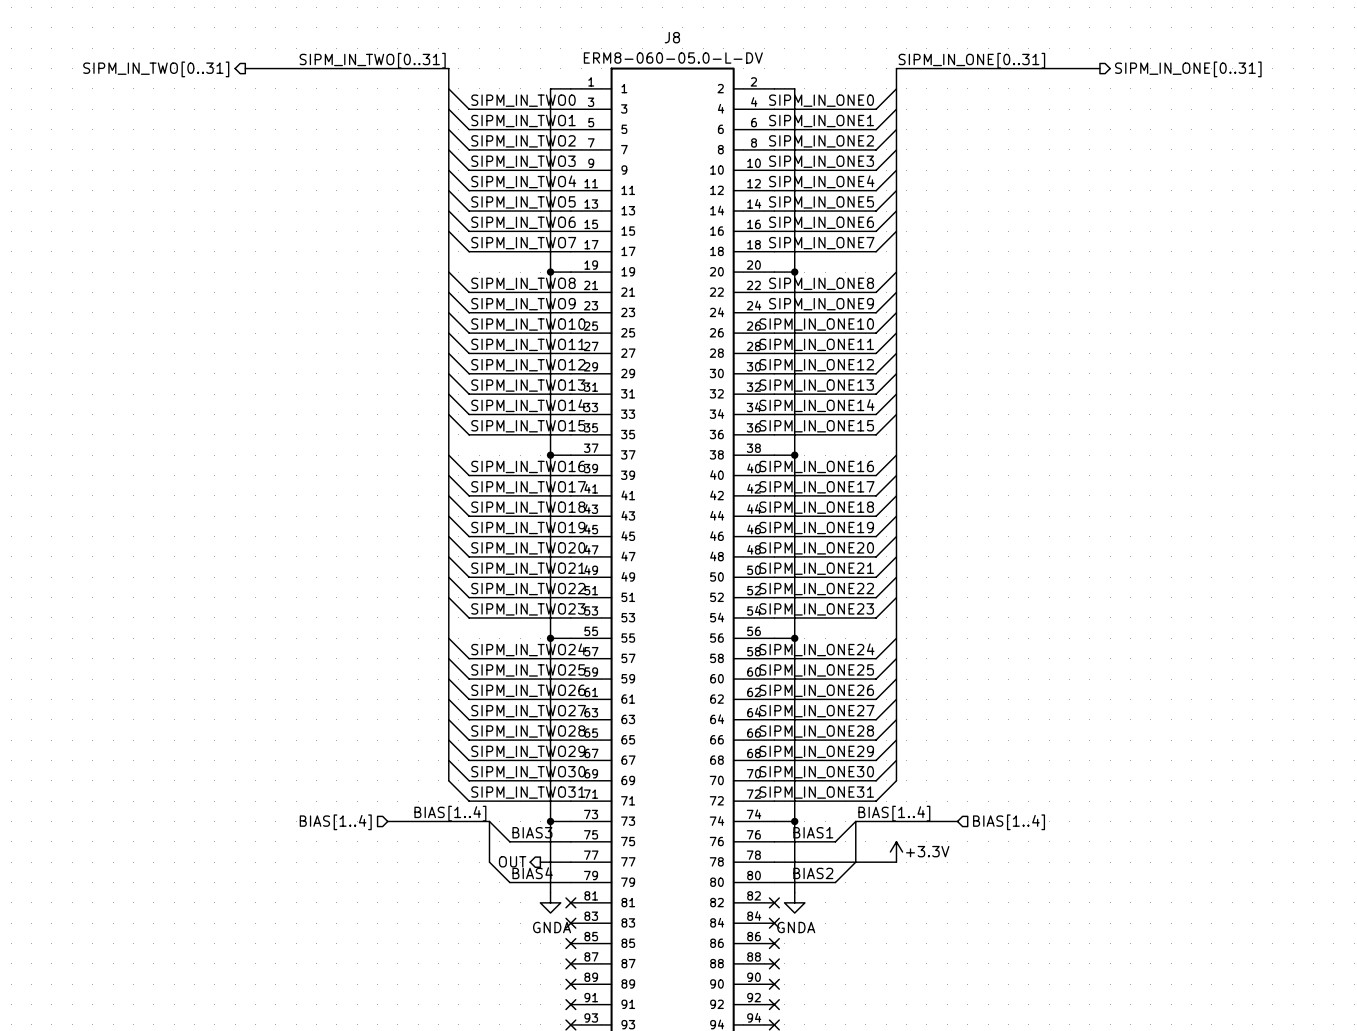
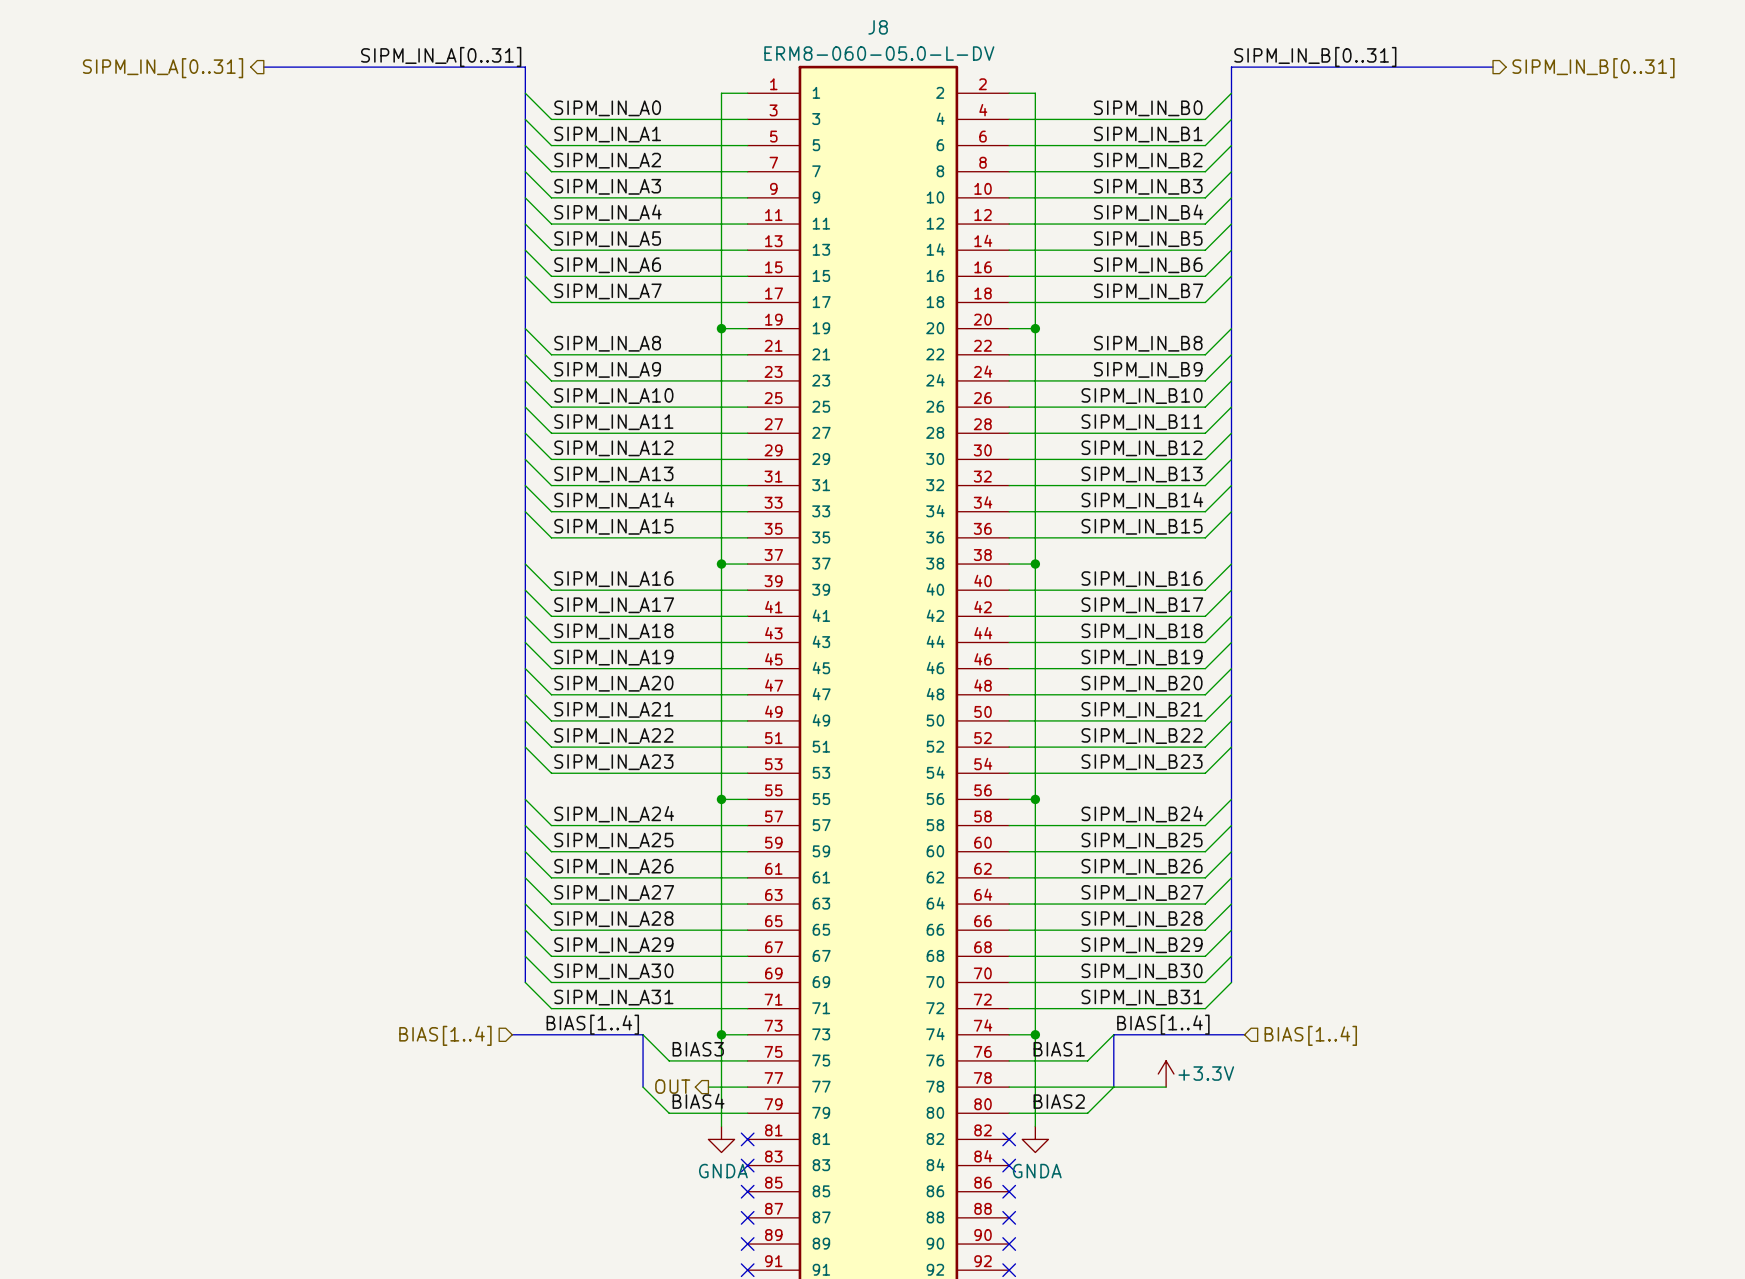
label: SIPM_IN_TWO[0..31] (372, 60) -> SIPM_IN_A[0..31] (441, 56)
label: SIPM_IN_ONE[0..31] (971, 60) -> SIPM_IN_B[0..31] (1315, 56)
bus: none -> (263, 67) (329, 67)
bus: (397, 68) (448, 68) (448, 780) -> (525, 67) (525, 982)
bus: (947, 68) (896, 68) (896, 780) -> (1231, 67) (1231, 982)
bus: none -> (1427, 67) (1493, 67)
hierarchical label: SIPM_IN_TWO[0..31] (156, 69) -> SIPM_IN_A[0..31] (163, 68)
hierarchical label: SIPM_IN_ONE[0..31] (1188, 69) -> SIPM_IN_B[0..31] (1593, 68)
wire: (448, 88) (469, 109) -> (525, 93) (551, 119) (616, 119)
wire: (896, 88) (876, 109) -> (1231, 93) (1205, 119) (1139, 119)
label: none -> SIPM_IN_A0 (607, 108)
label: SIPM_IN_TWO0 (523, 100) -> none
label: SIPM_IN_ONE0 (821, 100) -> none
label: none -> SIPM_IN_B0 (1148, 108)
wire: (448, 109) (469, 129) -> (525, 119) (551, 145) (616, 145)
wire: (896, 109) (876, 129) -> (1231, 119) (1205, 145) (1139, 145)
label: none -> SIPM_IN_A1 (607, 134)
label: SIPM_IN_TWO1 (523, 121) -> none
label: SIPM_IN_ONE1 (821, 121) -> none
label: none -> SIPM_IN_B1 (1148, 134)
wire: (448, 129) (469, 149) -> (525, 145) (551, 171) (616, 171)
wire: (896, 129) (876, 149) -> (1231, 145) (1205, 171) (1139, 171)
label: none -> SIPM_IN_A2 (607, 160)
label: SIPM_IN_TWO2 (523, 141) -> none
label: SIPM_IN_ONE2 (821, 141) -> none
label: none -> SIPM_IN_B2 (1148, 160)
wire: (448, 149) (469, 170) -> (525, 171) (551, 197) (616, 197)
wire: (896, 149) (876, 170) -> (1231, 171) (1205, 197) (1139, 197)
label: none -> SIPM_IN_A3 (607, 186)
label: SIPM_IN_TWO3 (523, 161) -> none
label: SIPM_IN_ONE3 (821, 161) -> none
label: none -> SIPM_IN_B3 (1148, 186)
wire: (448, 170) (469, 190) -> (525, 197) (551, 224) (616, 224)
wire: (896, 170) (876, 190) -> (1231, 197) (1205, 224) (1139, 224)
label: none -> SIPM_IN_A4 (607, 212)
label: SIPM_IN_TWO4 (523, 181) -> none
label: SIPM_IN_ONE4 (821, 181) -> none
label: none -> SIPM_IN_B4 (1148, 212)
wire: (448, 190) (469, 211) -> (525, 224) (551, 250) (616, 250)
wire: (896, 190) (876, 211) -> (1231, 224) (1205, 250) (1139, 250)
label: none -> SIPM_IN_A5 (607, 239)
label: SIPM_IN_TWO5 (523, 202) -> none
label: SIPM_IN_ONE5 (821, 202) -> none
label: none -> SIPM_IN_B5 (1148, 239)
wire: (448, 211) (469, 231) -> (525, 250) (551, 276) (616, 276)
wire: (896, 211) (876, 231) -> (1231, 250) (1205, 276) (1139, 276)
label: none -> SIPM_IN_A6 (607, 265)
label: SIPM_IN_TWO6 (523, 222) -> none
label: SIPM_IN_ONE6 (821, 222) -> none
label: none -> SIPM_IN_B6 (1148, 265)
wire: (448, 231) (469, 251) -> (525, 276) (551, 302) (616, 302)
wire: (896, 231) (876, 251) -> (1231, 276) (1205, 302) (1139, 302)
label: none -> SIPM_IN_A7 (607, 291)
label: SIPM_IN_TWO7 (523, 243) -> none
label: SIPM_IN_ONE7 (821, 243) -> none
label: none -> SIPM_IN_B7 (1148, 291)
wire: (448, 272) (469, 292) -> (525, 328) (551, 354) (616, 354)
wire: (896, 272) (876, 292) -> (1231, 328) (1205, 354) (1139, 354)
label: none -> SIPM_IN_A8 (607, 343)
label: SIPM_IN_TWO8 (523, 283) -> none
label: SIPM_IN_ONE8 (821, 283) -> none
label: none -> SIPM_IN_B8 (1148, 343)
wire: (448, 292) (469, 312) -> (525, 354) (551, 380) (616, 380)
wire: (896, 292) (876, 312) -> (1231, 354) (1205, 380) (1139, 380)
label: none -> SIPM_IN_A9 (607, 369)
label: SIPM_IN_TWO9 (523, 304) -> none
label: SIPM_IN_ONE9 (821, 304) -> none
label: none -> SIPM_IN_B9 (1148, 369)
wire: (448, 312) (469, 333) -> (525, 380) (551, 407) (616, 407)
wire: (896, 312) (876, 333) -> (1231, 380) (1205, 407) (1139, 407)
label: none -> SIPM_IN_A10 (613, 396)
label: SIPM_IN_TWO10 (528, 324) -> none
label: SIPM_IN_ONE10 (816, 324) -> none
label: none -> SIPM_IN_B10 (1142, 396)
wire: (448, 333) (469, 353) -> (525, 407) (551, 433) (616, 433)
wire: (896, 333) (876, 353) -> (1231, 407) (1205, 433) (1139, 433)
label: none -> SIPM_IN_A11 (613, 422)
label: SIPM_IN_TWO11 (528, 344) -> none
label: SIPM_IN_ONE11 (816, 344) -> none
label: none -> SIPM_IN_B11 (1142, 422)
wire: (448, 353) (469, 373) -> (525, 433) (551, 459) (616, 459)
wire: (896, 353) (876, 373) -> (1231, 433) (1205, 459) (1139, 459)
label: none -> SIPM_IN_A12 (613, 448)
label: SIPM_IN_TWO12 (528, 365) -> none
label: SIPM_IN_ONE12 (816, 365) -> none
label: none -> SIPM_IN_B12 (1142, 448)
wire: (448, 373) (469, 394) -> (525, 459) (551, 485) (616, 485)
wire: (896, 373) (876, 394) -> (1231, 459) (1205, 485) (1139, 485)
label: none -> SIPM_IN_A13 (613, 474)
label: SIPM_IN_TWO13 (528, 385) -> none
label: SIPM_IN_ONE13 (816, 385) -> none
label: none -> SIPM_IN_B13 (1142, 474)
wire: (448, 394) (469, 414) -> (525, 485) (551, 511) (616, 511)
wire: (896, 394) (876, 414) -> (1231, 485) (1205, 511) (1139, 511)
label: none -> SIPM_IN_A14 (614, 500)
label: SIPM_IN_TWO14 (528, 405) -> none
label: SIPM_IN_ONE14 (816, 405) -> none
label: none -> SIPM_IN_B14 (1142, 500)
wire: (448, 414) (469, 434) -> (525, 511) (551, 537) (616, 537)
wire: (896, 414) (876, 434) -> (1231, 511) (1205, 537) (1139, 537)
label: none -> SIPM_IN_A15 (613, 526)
label: SIPM_IN_TWO15 (528, 426) -> none
label: SIPM_IN_ONE15 (816, 426) -> none
label: none -> SIPM_IN_B15 (1142, 526)
wire: (448, 455) (469, 475) -> (525, 564) (551, 590) (616, 590)
wire: (896, 455) (876, 475) -> (1231, 564) (1205, 590) (1139, 590)
label: none -> SIPM_IN_A16 (613, 579)
label: SIPM_IN_TWO16 (528, 466) -> none
label: SIPM_IN_ONE16 (816, 466) -> none
label: none -> SIPM_IN_B16 (1142, 579)
wire: (448, 475) (469, 495) -> (525, 590) (551, 616) (616, 616)
wire: (896, 475) (876, 495) -> (1231, 590) (1205, 616) (1139, 616)
label: none -> SIPM_IN_A17 (614, 605)
label: SIPM_IN_TWO17 (528, 487) -> none
label: SIPM_IN_ONE17 (816, 487) -> none
label: none -> SIPM_IN_B17 (1142, 605)
wire: (448, 495) (469, 516) -> (525, 616) (551, 642) (616, 642)
wire: (896, 495) (876, 516) -> (1231, 616) (1205, 642) (1139, 642)
label: none -> SIPM_IN_A18 (613, 631)
label: SIPM_IN_TWO18 (528, 507) -> none
label: SIPM_IN_ONE18 (816, 507) -> none
label: none -> SIPM_IN_B18 (1142, 631)
wire: (448, 516) (469, 536) -> (525, 642) (551, 668) (616, 668)
wire: (896, 516) (876, 536) -> (1231, 642) (1205, 668) (1139, 668)
label: none -> SIPM_IN_A19 (613, 657)
label: SIPM_IN_TWO19 (528, 527) -> none
label: SIPM_IN_ONE19 (816, 527) -> none
label: none -> SIPM_IN_B19 (1142, 657)
wire: (448, 536) (469, 556) -> (525, 668) (551, 694) (616, 694)
wire: (896, 536) (876, 556) -> (1231, 668) (1205, 694) (1139, 694)
label: none -> SIPM_IN_A20 (613, 683)
label: SIPM_IN_TWO20 (528, 548) -> none
label: SIPM_IN_ONE20 (816, 548) -> none
label: none -> SIPM_IN_B20 (1142, 683)
wire: (448, 556) (469, 577) -> (525, 694) (551, 720) (616, 720)
wire: (896, 556) (876, 577) -> (1231, 694) (1205, 720) (1139, 720)
label: none -> SIPM_IN_A21 (613, 709)
label: SIPM_IN_TWO21 (528, 568) -> none
label: SIPM_IN_ONE21 (816, 568) -> none
label: none -> SIPM_IN_B21 (1142, 709)
wire: (448, 577) (469, 597) -> (525, 720) (551, 747) (616, 747)
wire: (896, 577) (876, 597) -> (1231, 720) (1205, 747) (1139, 747)
label: none -> SIPM_IN_A22 (613, 736)
label: SIPM_IN_TWO22 (528, 589) -> none
label: SIPM_IN_ONE22 (816, 589) -> none
label: none -> SIPM_IN_B22 (1142, 736)
wire: (448, 597) (469, 617) -> (525, 747) (551, 773) (616, 773)
wire: (896, 597) (876, 617) -> (1231, 747) (1205, 773) (1139, 773)
label: none -> SIPM_IN_A23 (613, 762)
label: SIPM_IN_TWO23 (528, 609) -> none
label: SIPM_IN_ONE23 (816, 609) -> none
label: none -> SIPM_IN_B23 (1142, 762)
wire: (448, 638) (469, 658) -> (525, 799) (551, 825) (616, 825)
wire: (896, 638) (876, 658) -> (1231, 799) (1205, 825) (1139, 825)
label: none -> SIPM_IN_A24 (614, 814)
label: SIPM_IN_TWO24 (528, 649) -> none
label: SIPM_IN_ONE24 (816, 649) -> none
label: none -> SIPM_IN_B24 (1142, 814)
wire: (448, 658) (469, 679) -> (525, 825) (551, 851) (616, 851)
wire: (896, 658) (876, 679) -> (1231, 825) (1205, 851) (1139, 851)
label: none -> SIPM_IN_A25 (613, 840)
label: SIPM_IN_TWO25 (528, 670) -> none
label: SIPM_IN_ONE25 (816, 670) -> none
label: none -> SIPM_IN_B25 (1142, 840)
wire: (448, 679) (469, 699) -> (525, 851) (551, 877) (616, 877)
wire: (896, 679) (876, 699) -> (1231, 851) (1205, 877) (1139, 877)
label: none -> SIPM_IN_A26 (613, 866)
label: SIPM_IN_TWO26 (528, 690) -> none
label: SIPM_IN_ONE26 (816, 690) -> none
label: none -> SIPM_IN_B26 (1142, 866)
wire: (448, 699) (469, 719) -> (525, 877) (551, 904) (616, 904)
wire: (896, 699) (876, 719) -> (1231, 877) (1205, 904) (1139, 904)
label: none -> SIPM_IN_A27 (614, 892)
label: SIPM_IN_TWO27 (528, 711) -> none
label: SIPM_IN_ONE27 (816, 711) -> none
label: none -> SIPM_IN_B27 (1142, 892)
wire: (448, 719) (469, 740) -> (525, 904) (551, 930) (616, 930)
wire: (896, 719) (876, 740) -> (1231, 904) (1205, 930) (1139, 930)
label: none -> SIPM_IN_A28 (613, 919)
label: SIPM_IN_TWO28 (528, 731) -> none
label: SIPM_IN_ONE28 (816, 731) -> none
label: none -> SIPM_IN_B28 (1142, 919)
wire: (448, 740) (469, 760) -> (525, 930) (551, 956) (616, 956)
wire: (896, 740) (876, 760) -> (1231, 930) (1205, 956) (1139, 956)
label: none -> SIPM_IN_A29 (613, 945)
label: SIPM_IN_TWO29 (528, 751) -> none
label: SIPM_IN_ONE29 (816, 751) -> none
label: none -> SIPM_IN_B29 (1142, 945)
wire: (448, 760) (469, 780) -> (525, 956) (551, 982) (616, 982)
wire: (896, 760) (876, 780) -> (1231, 956) (1205, 982) (1139, 982)
label: none -> SIPM_IN_A30 (613, 971)
label: SIPM_IN_TWO30 (528, 772) -> none
label: SIPM_IN_ONE30 (816, 772) -> none
label: none -> SIPM_IN_B30 (1142, 971)
wire: (448, 780) (469, 801) -> (525, 982) (551, 1008) (616, 1008)
wire: (896, 780) (876, 801) -> (1231, 982) (1205, 1008) (1139, 1008)
label: none -> SIPM_IN_A31 (613, 997)
label: SIPM_IN_TWO31 (528, 792) -> none
label: SIPM_IN_ONE31 (816, 792) -> none
label: none -> SIPM_IN_B31 (1142, 997)

